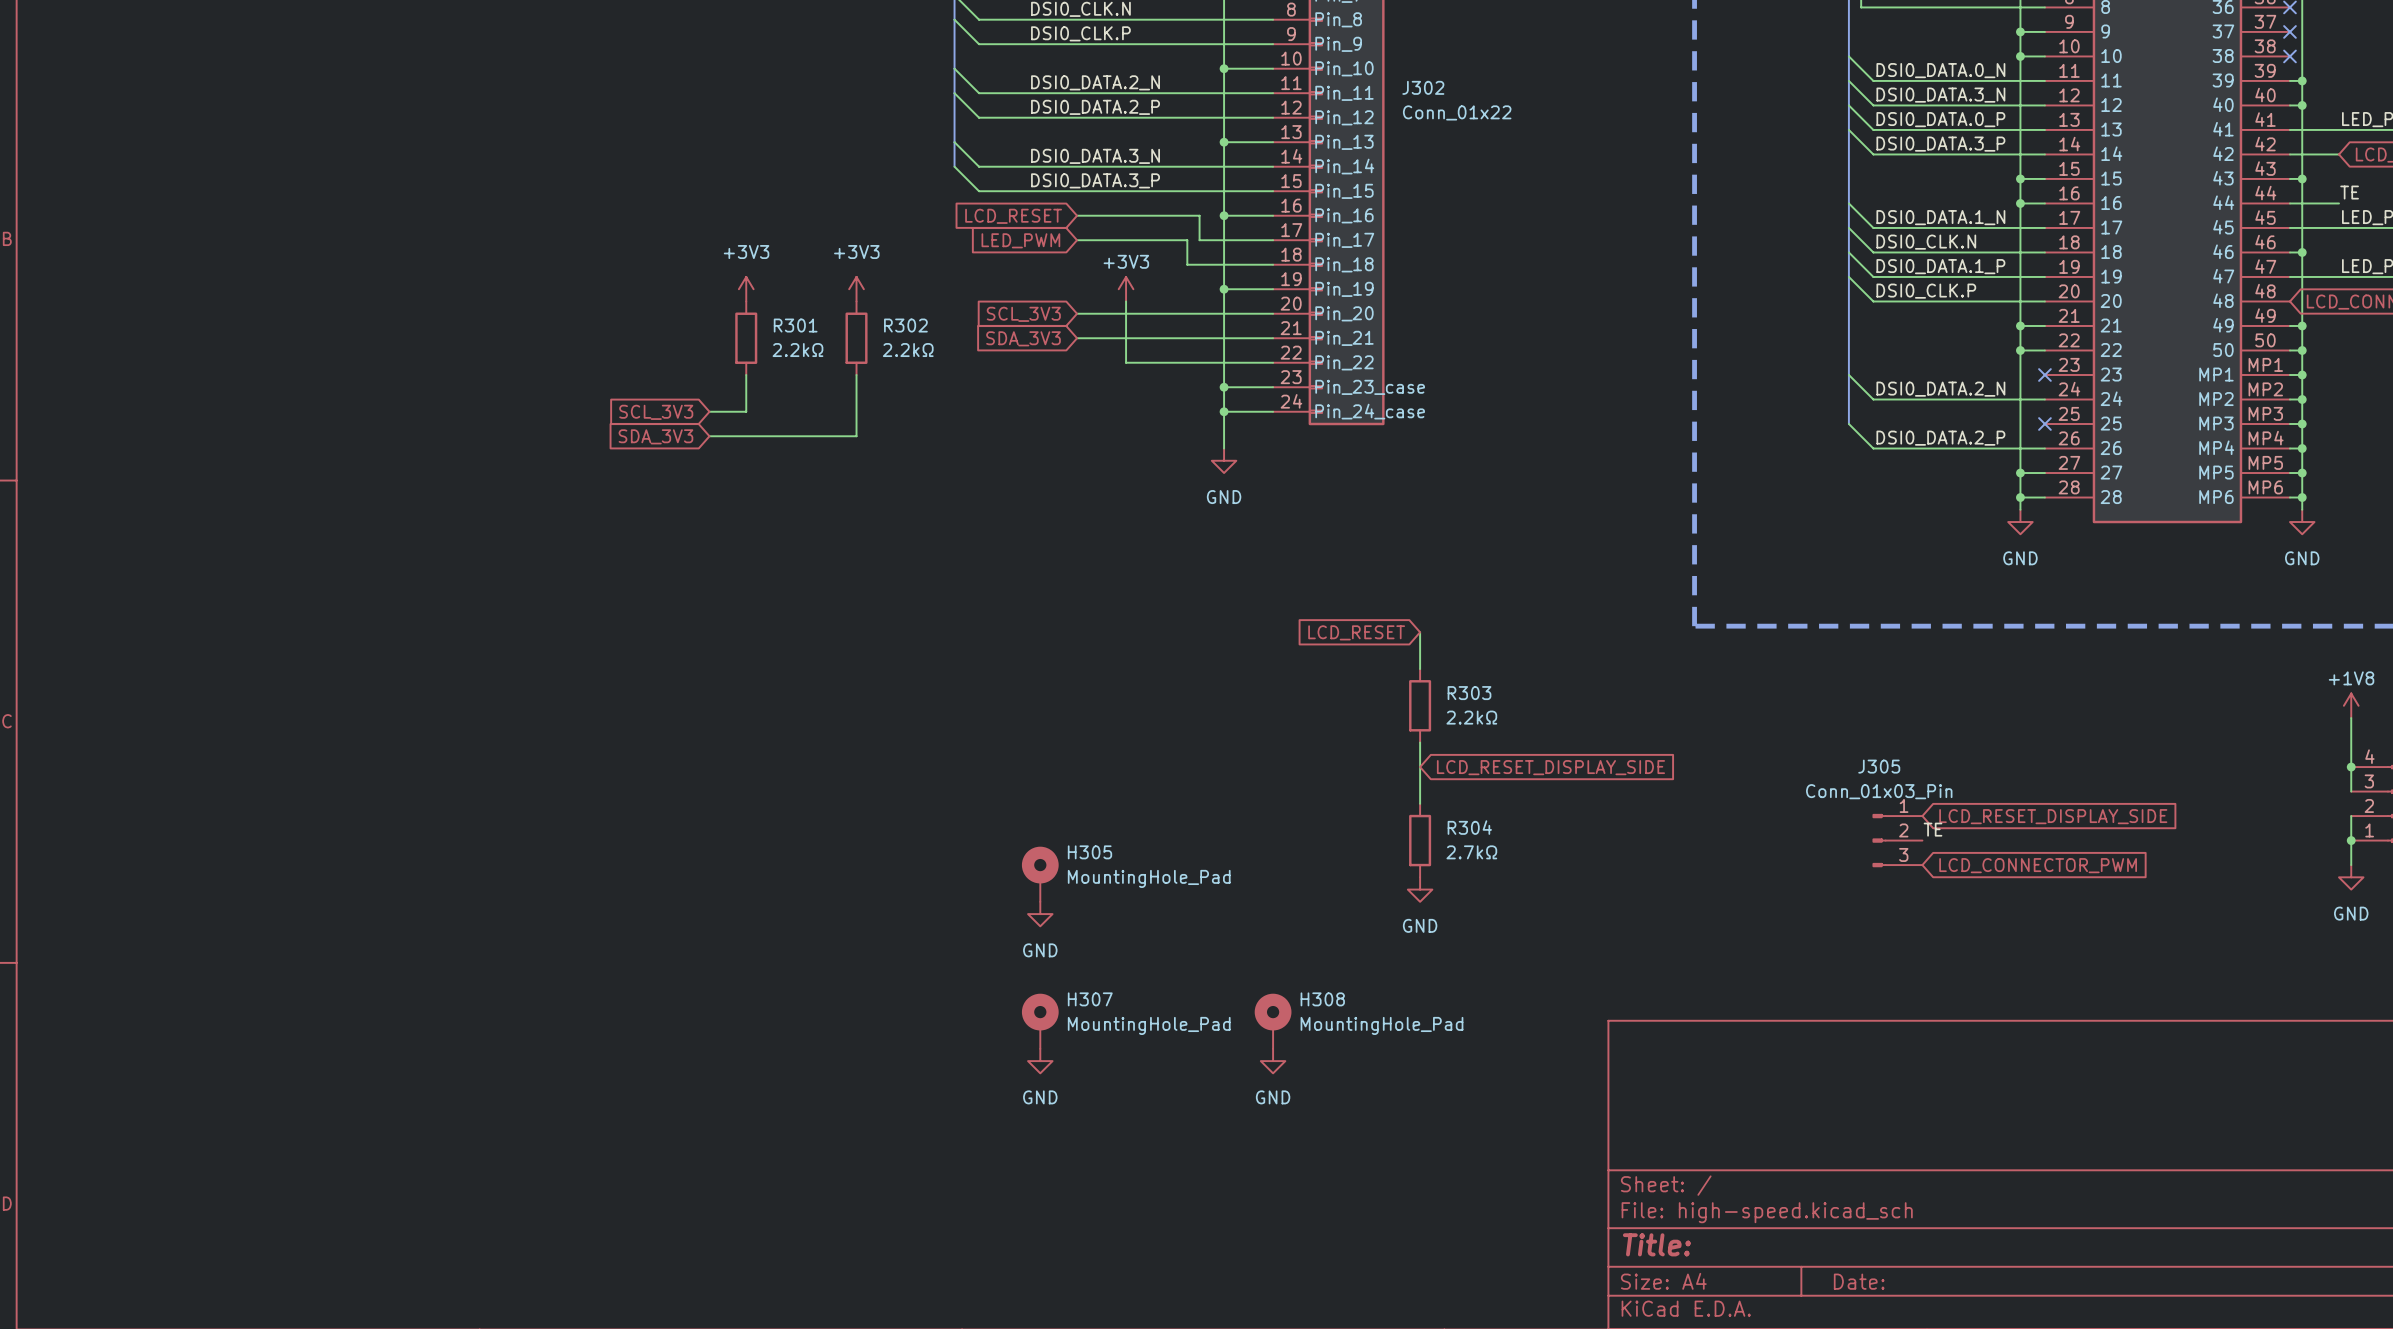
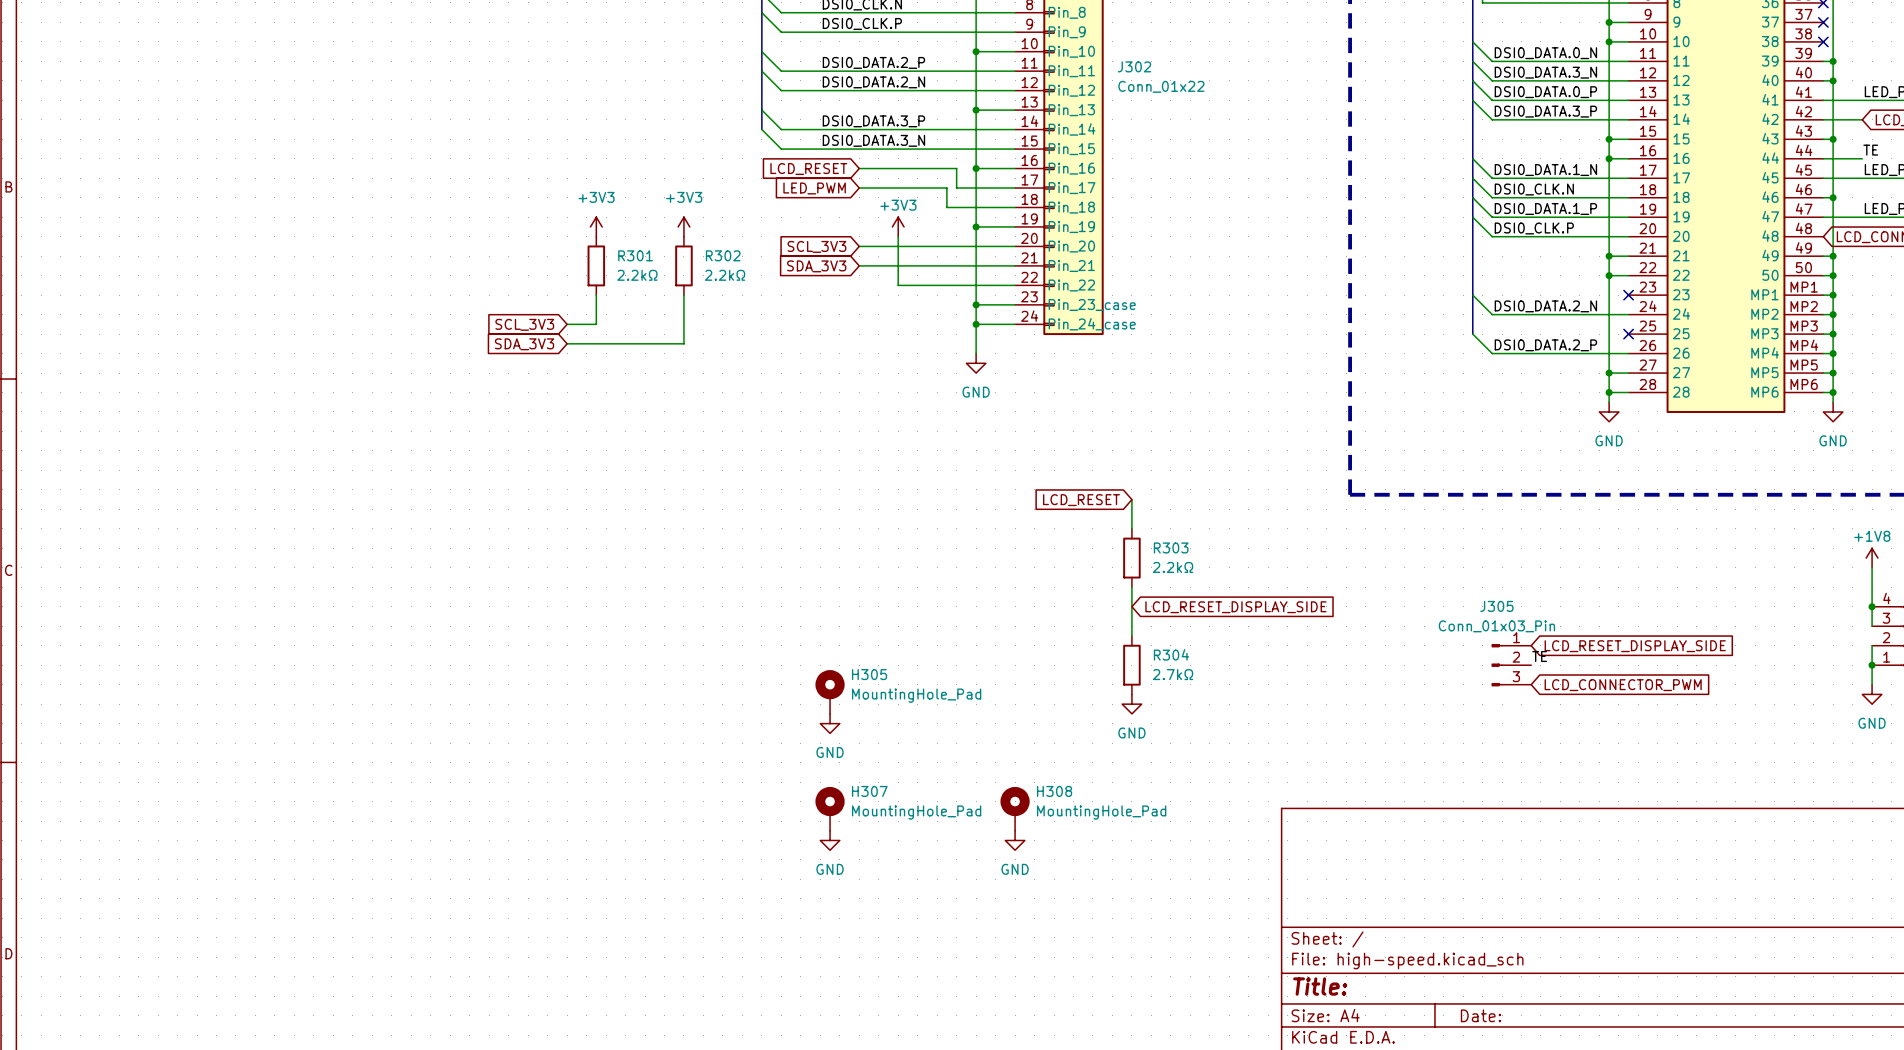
label: DSI0_DATA.2_N (1095, 82) -> DSI0_DATA.2_P (873, 62)
label: DSI0_DATA.2_P (1095, 107) -> DSI0_DATA.2_N (873, 82)
label: DSI0_DATA.3_N (1095, 156) -> DSI0_DATA.3_P (873, 121)
label: DSI0_DATA.3_P (1095, 180) -> DSI0_DATA.3_N (873, 140)

